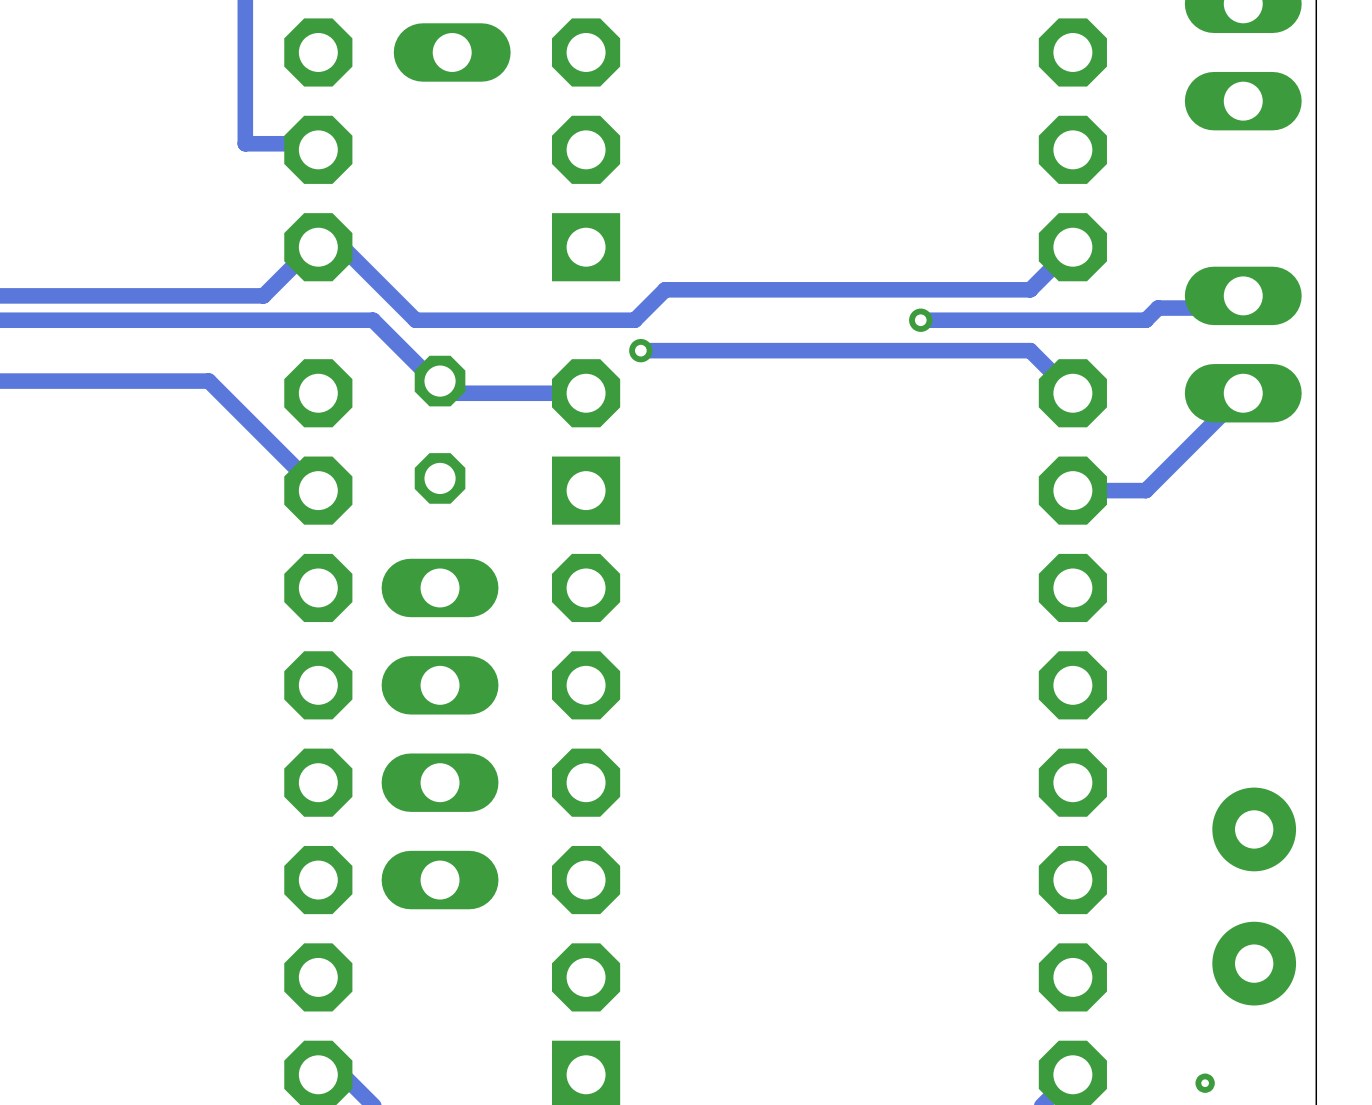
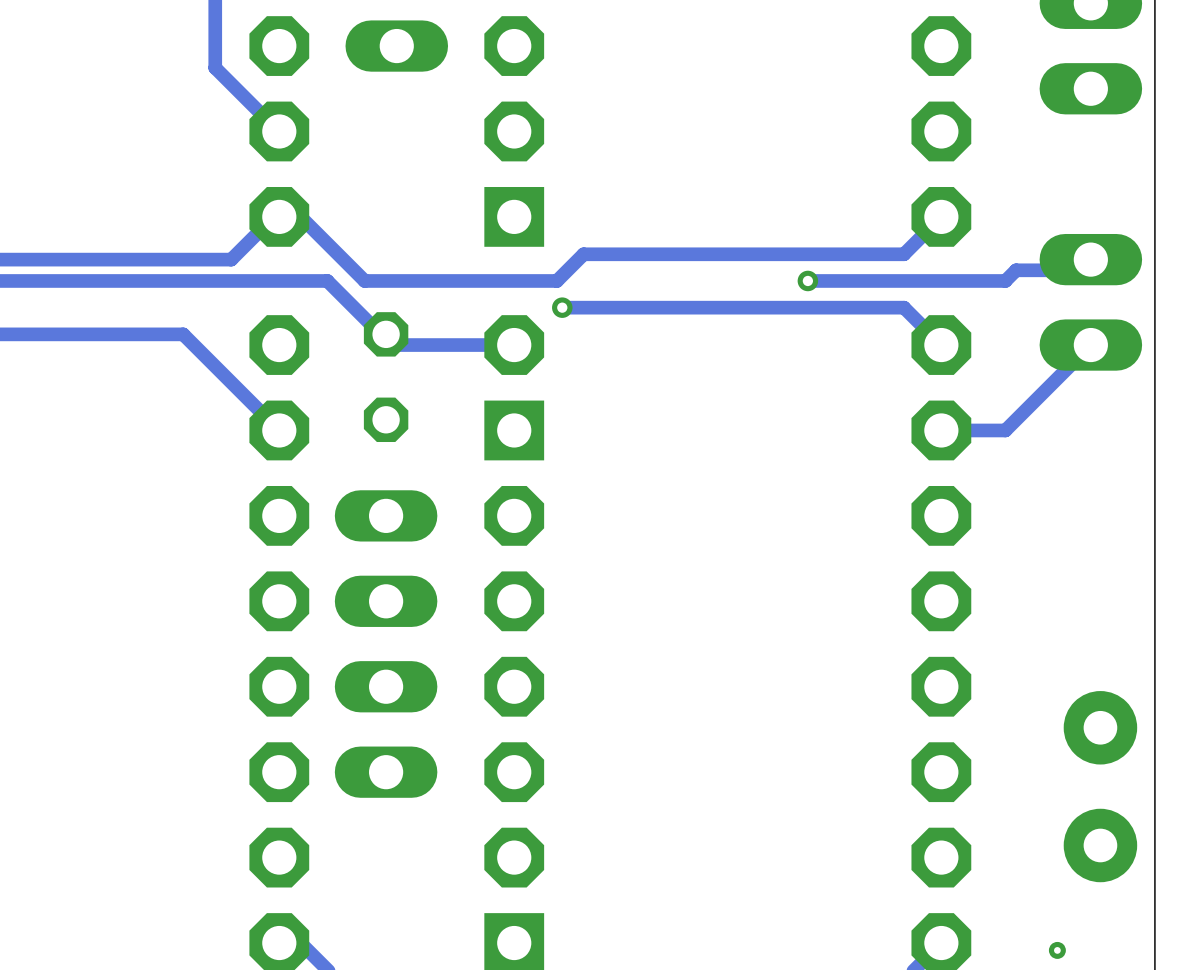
track: (245, 77) (245, 143) (311, 143) -> (215, 67) (273, 126)

